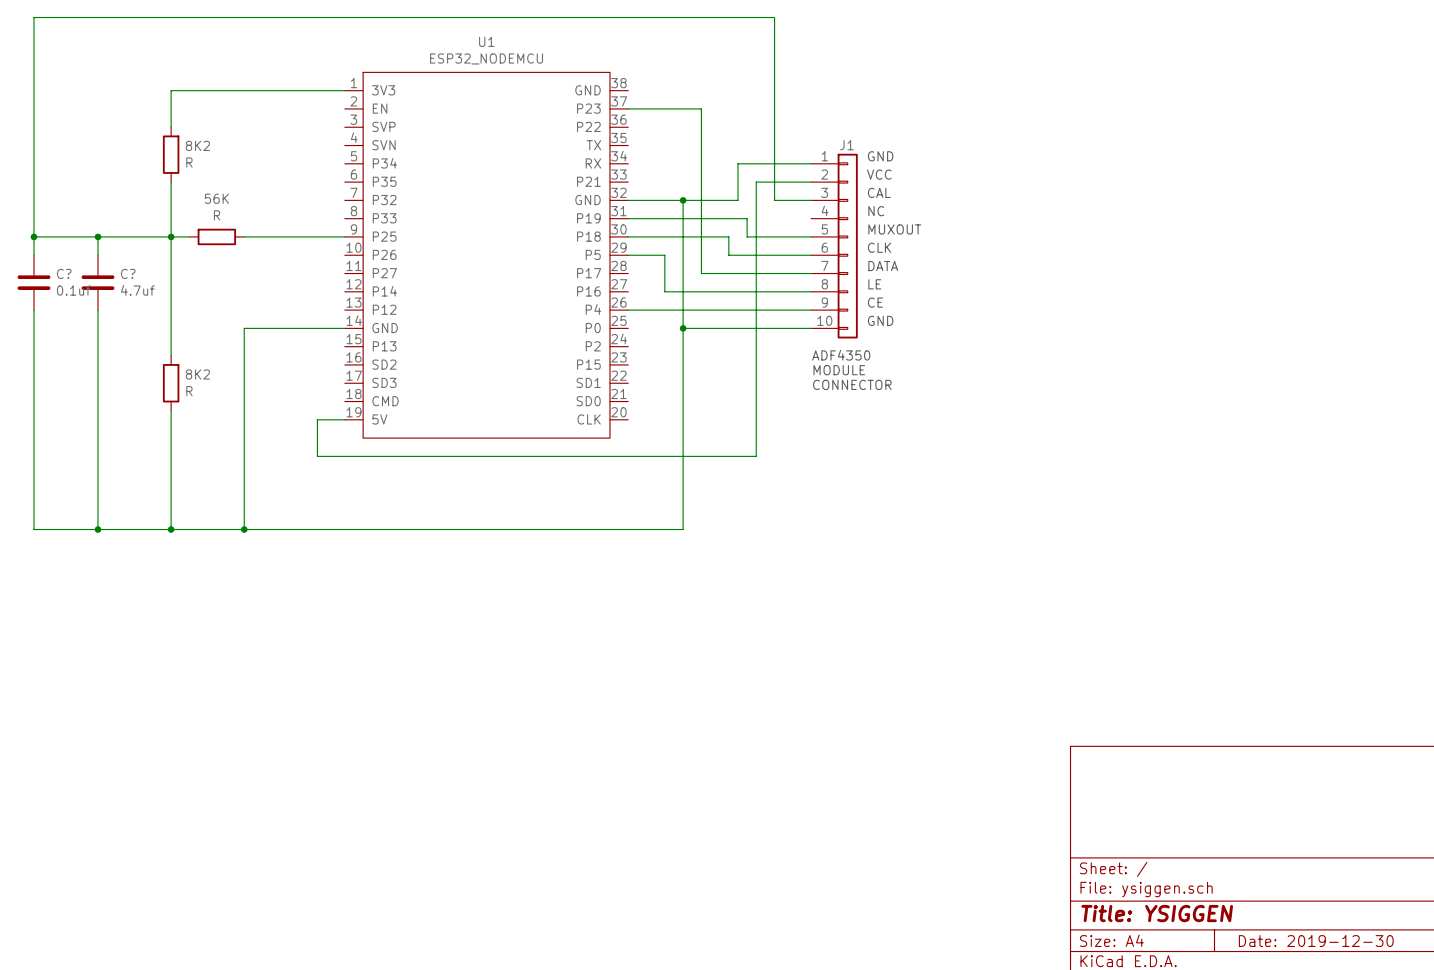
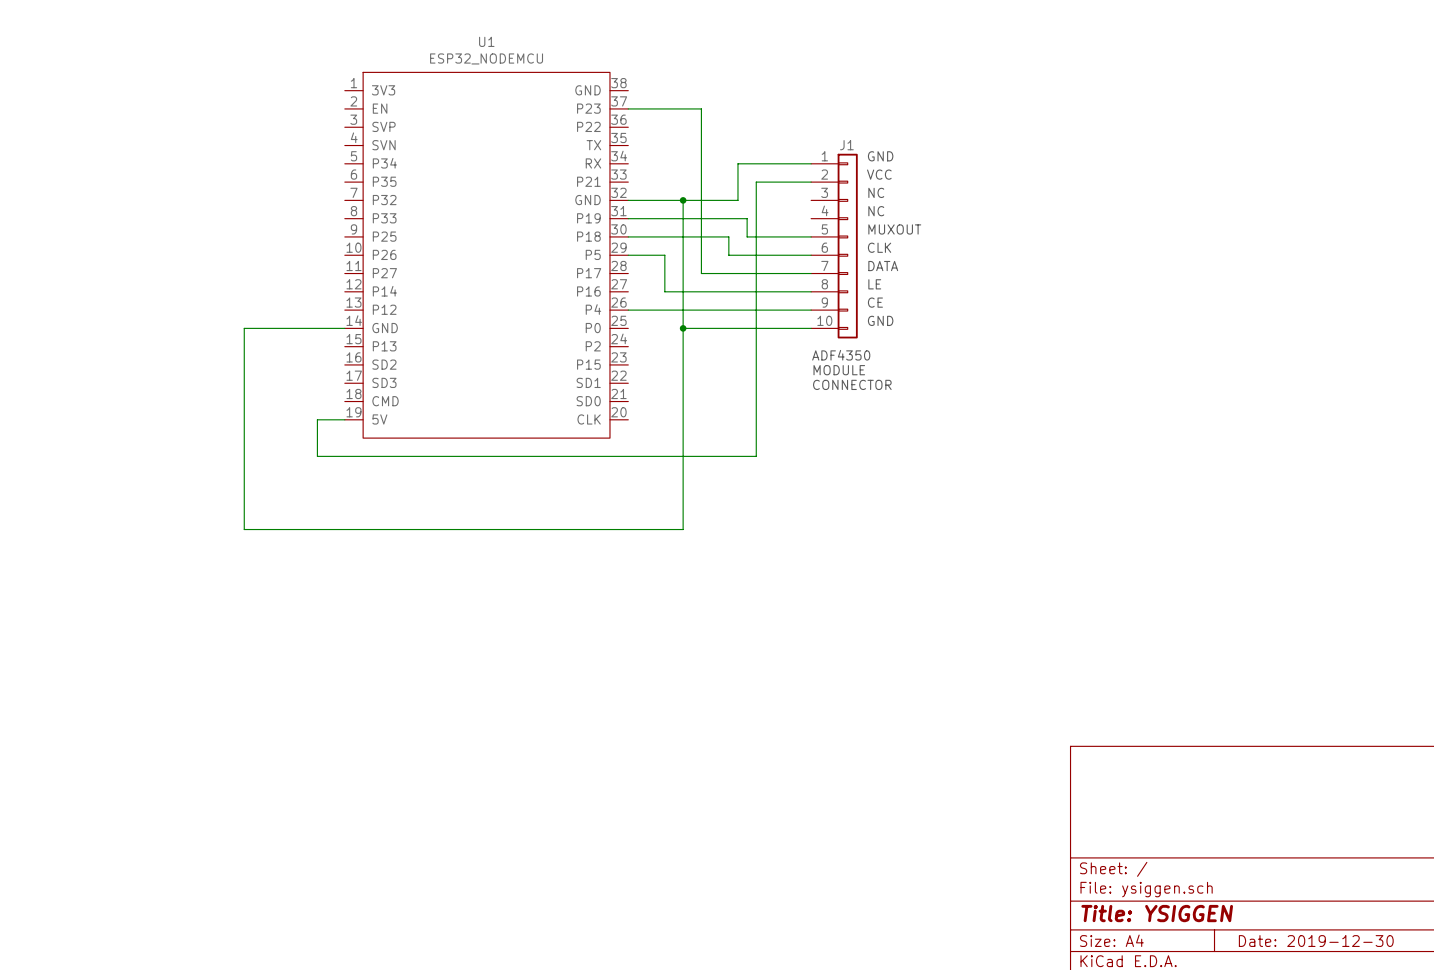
wire: (344, 90) (171, 90) (171, 127) -> none
8K2: R (171, 154) -> none
wire: (171, 182) (171, 355) -> none
text: CAL (879, 192) -> NC (876, 192)
wire: (811, 200) (774, 200) (774, 17) (33, 17) (33, 255) -> none
wire: (33, 236) (189, 236) -> none
junction: (33, 236) -> none
wire: (97, 236) (97, 255) -> none
junction: (97, 236) -> none
junction: (171, 236) -> none
56K: R (216, 236) -> none
wire: (244, 236) (344, 236) -> none
C?: 0.1uf (33, 282) -> none
C?: 4.7uf (97, 282) -> none
wire: (33, 310) (33, 529) (244, 529) -> none
wire: (97, 310) (97, 529) -> none
8K2: R (171, 383) -> none
wire: (171, 410) (171, 529) -> none
junction: (97, 529) -> none
junction: (171, 529) -> none
junction: (244, 529) -> none

